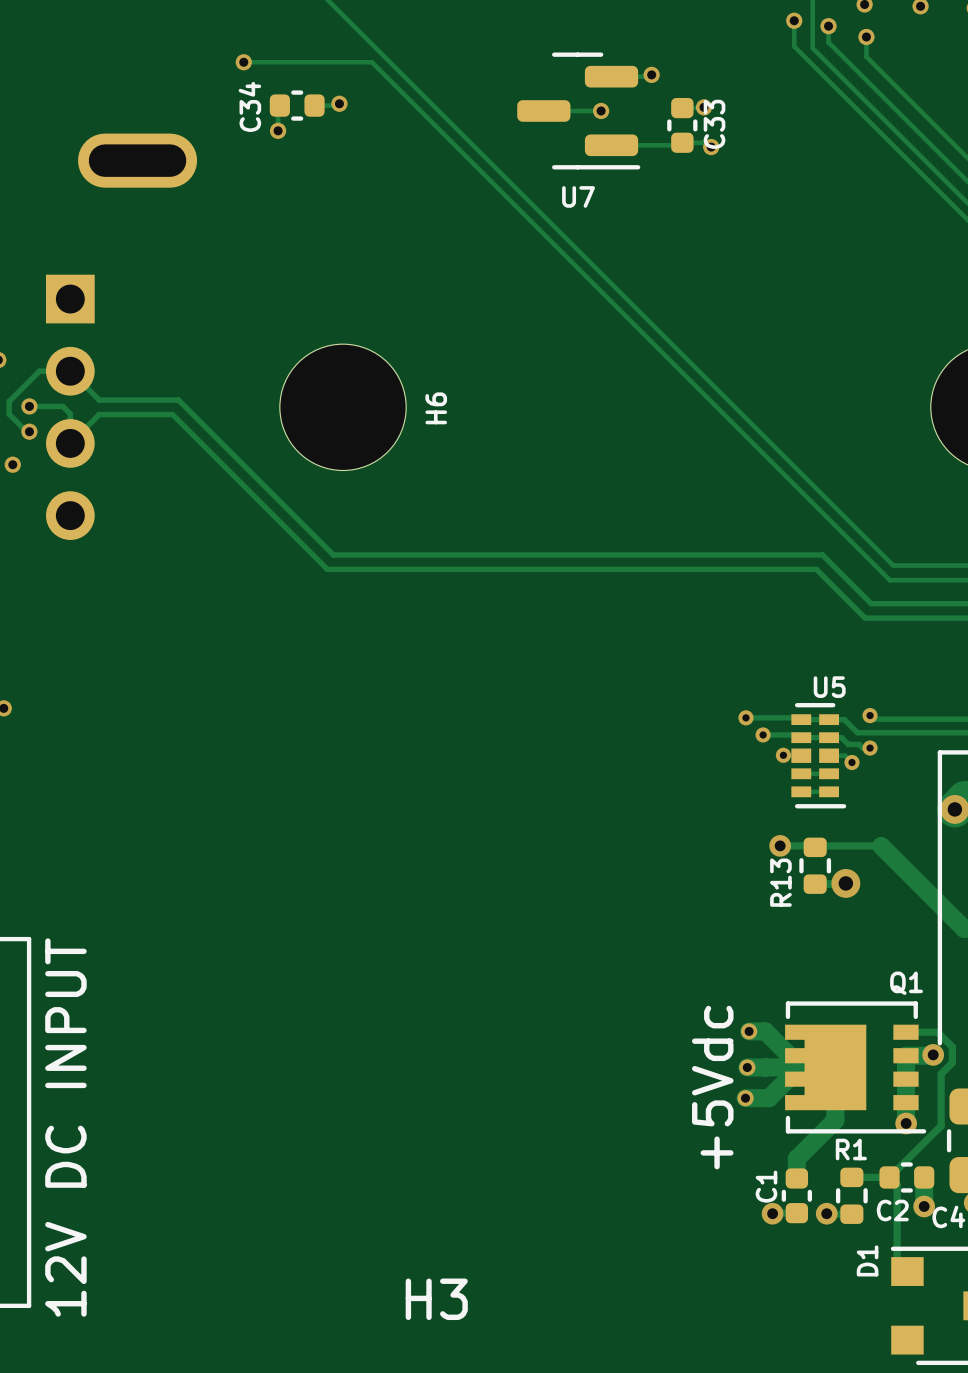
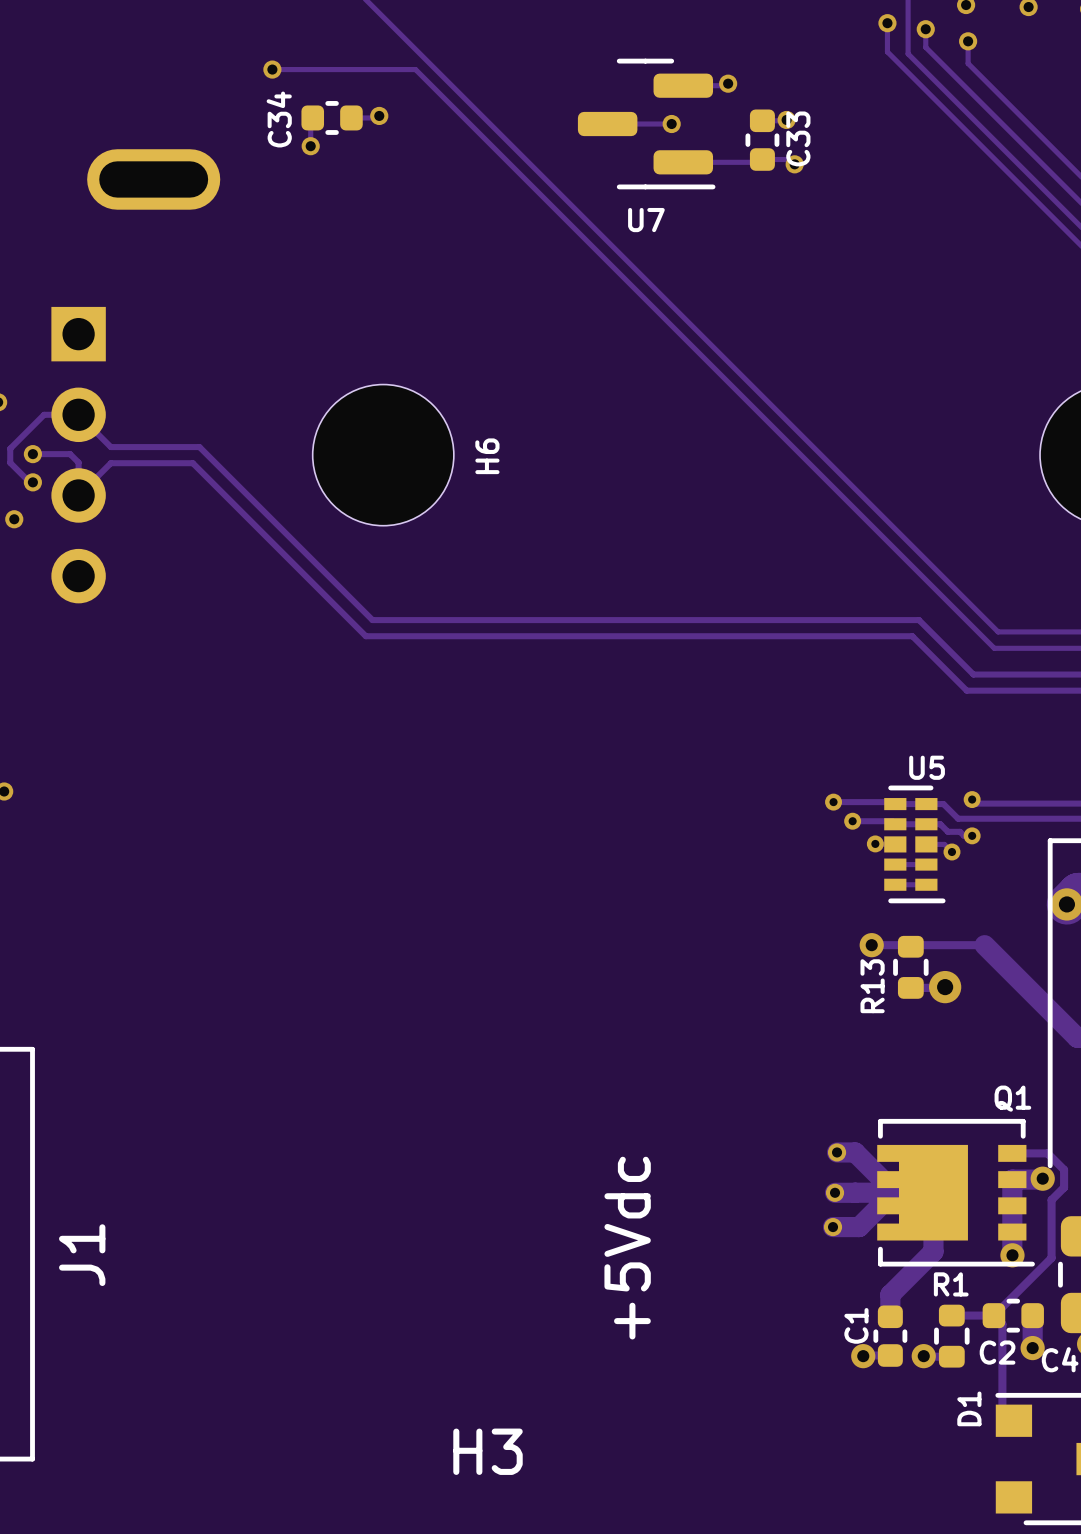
text position: +5Vdc (712, 1087) -> +5Vdc (627, 1248)
J1 name: none -> J1 (82, 1255)
text: 12V DC INPUT (65, 1127) -> none

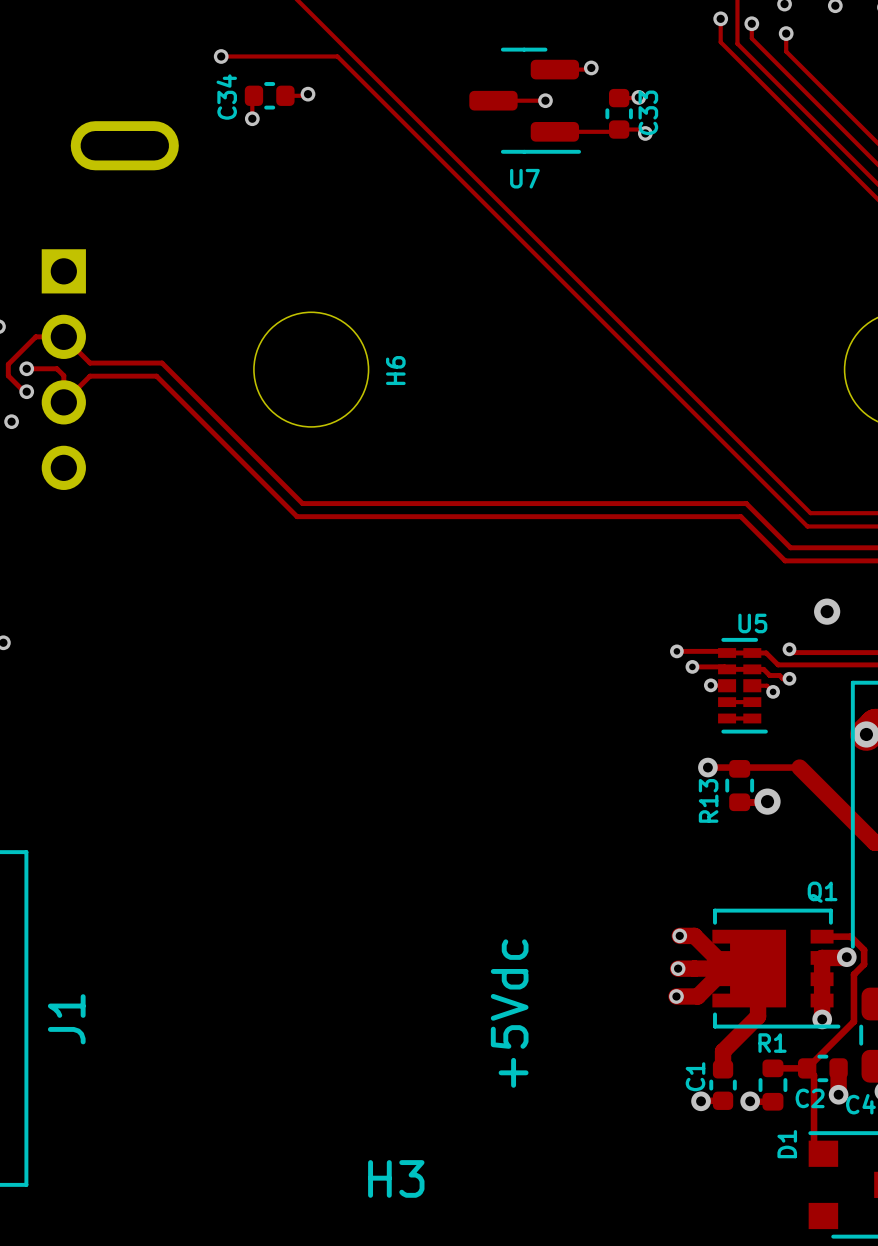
via: none -> (827, 611)

